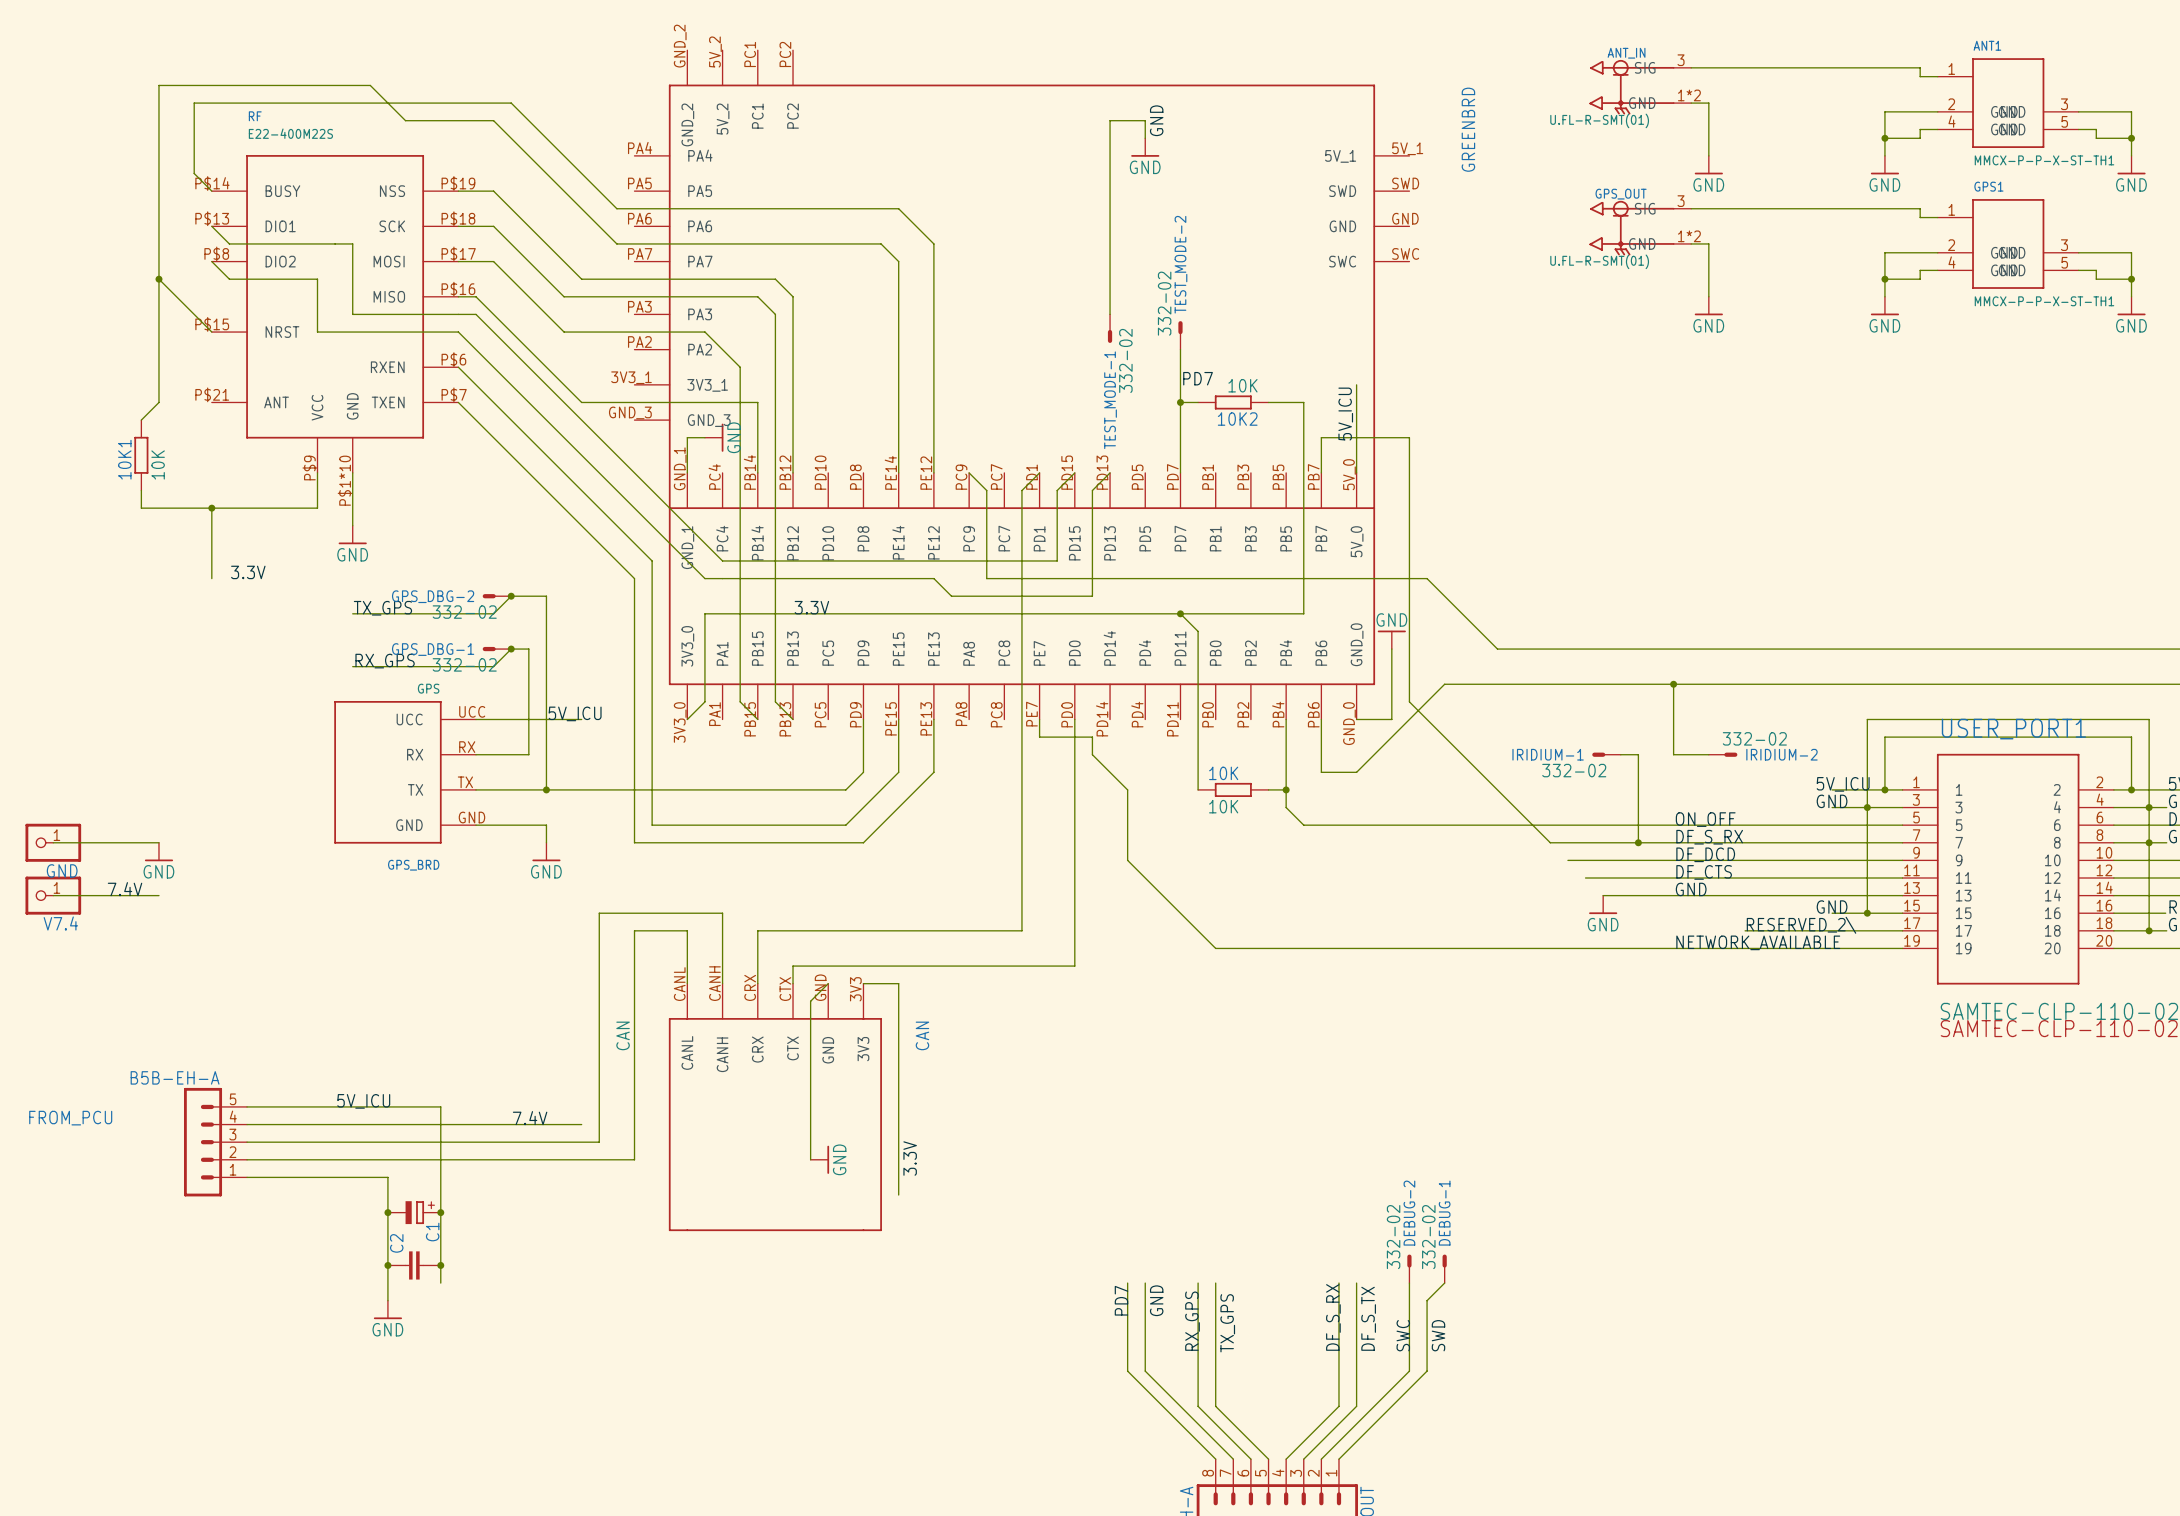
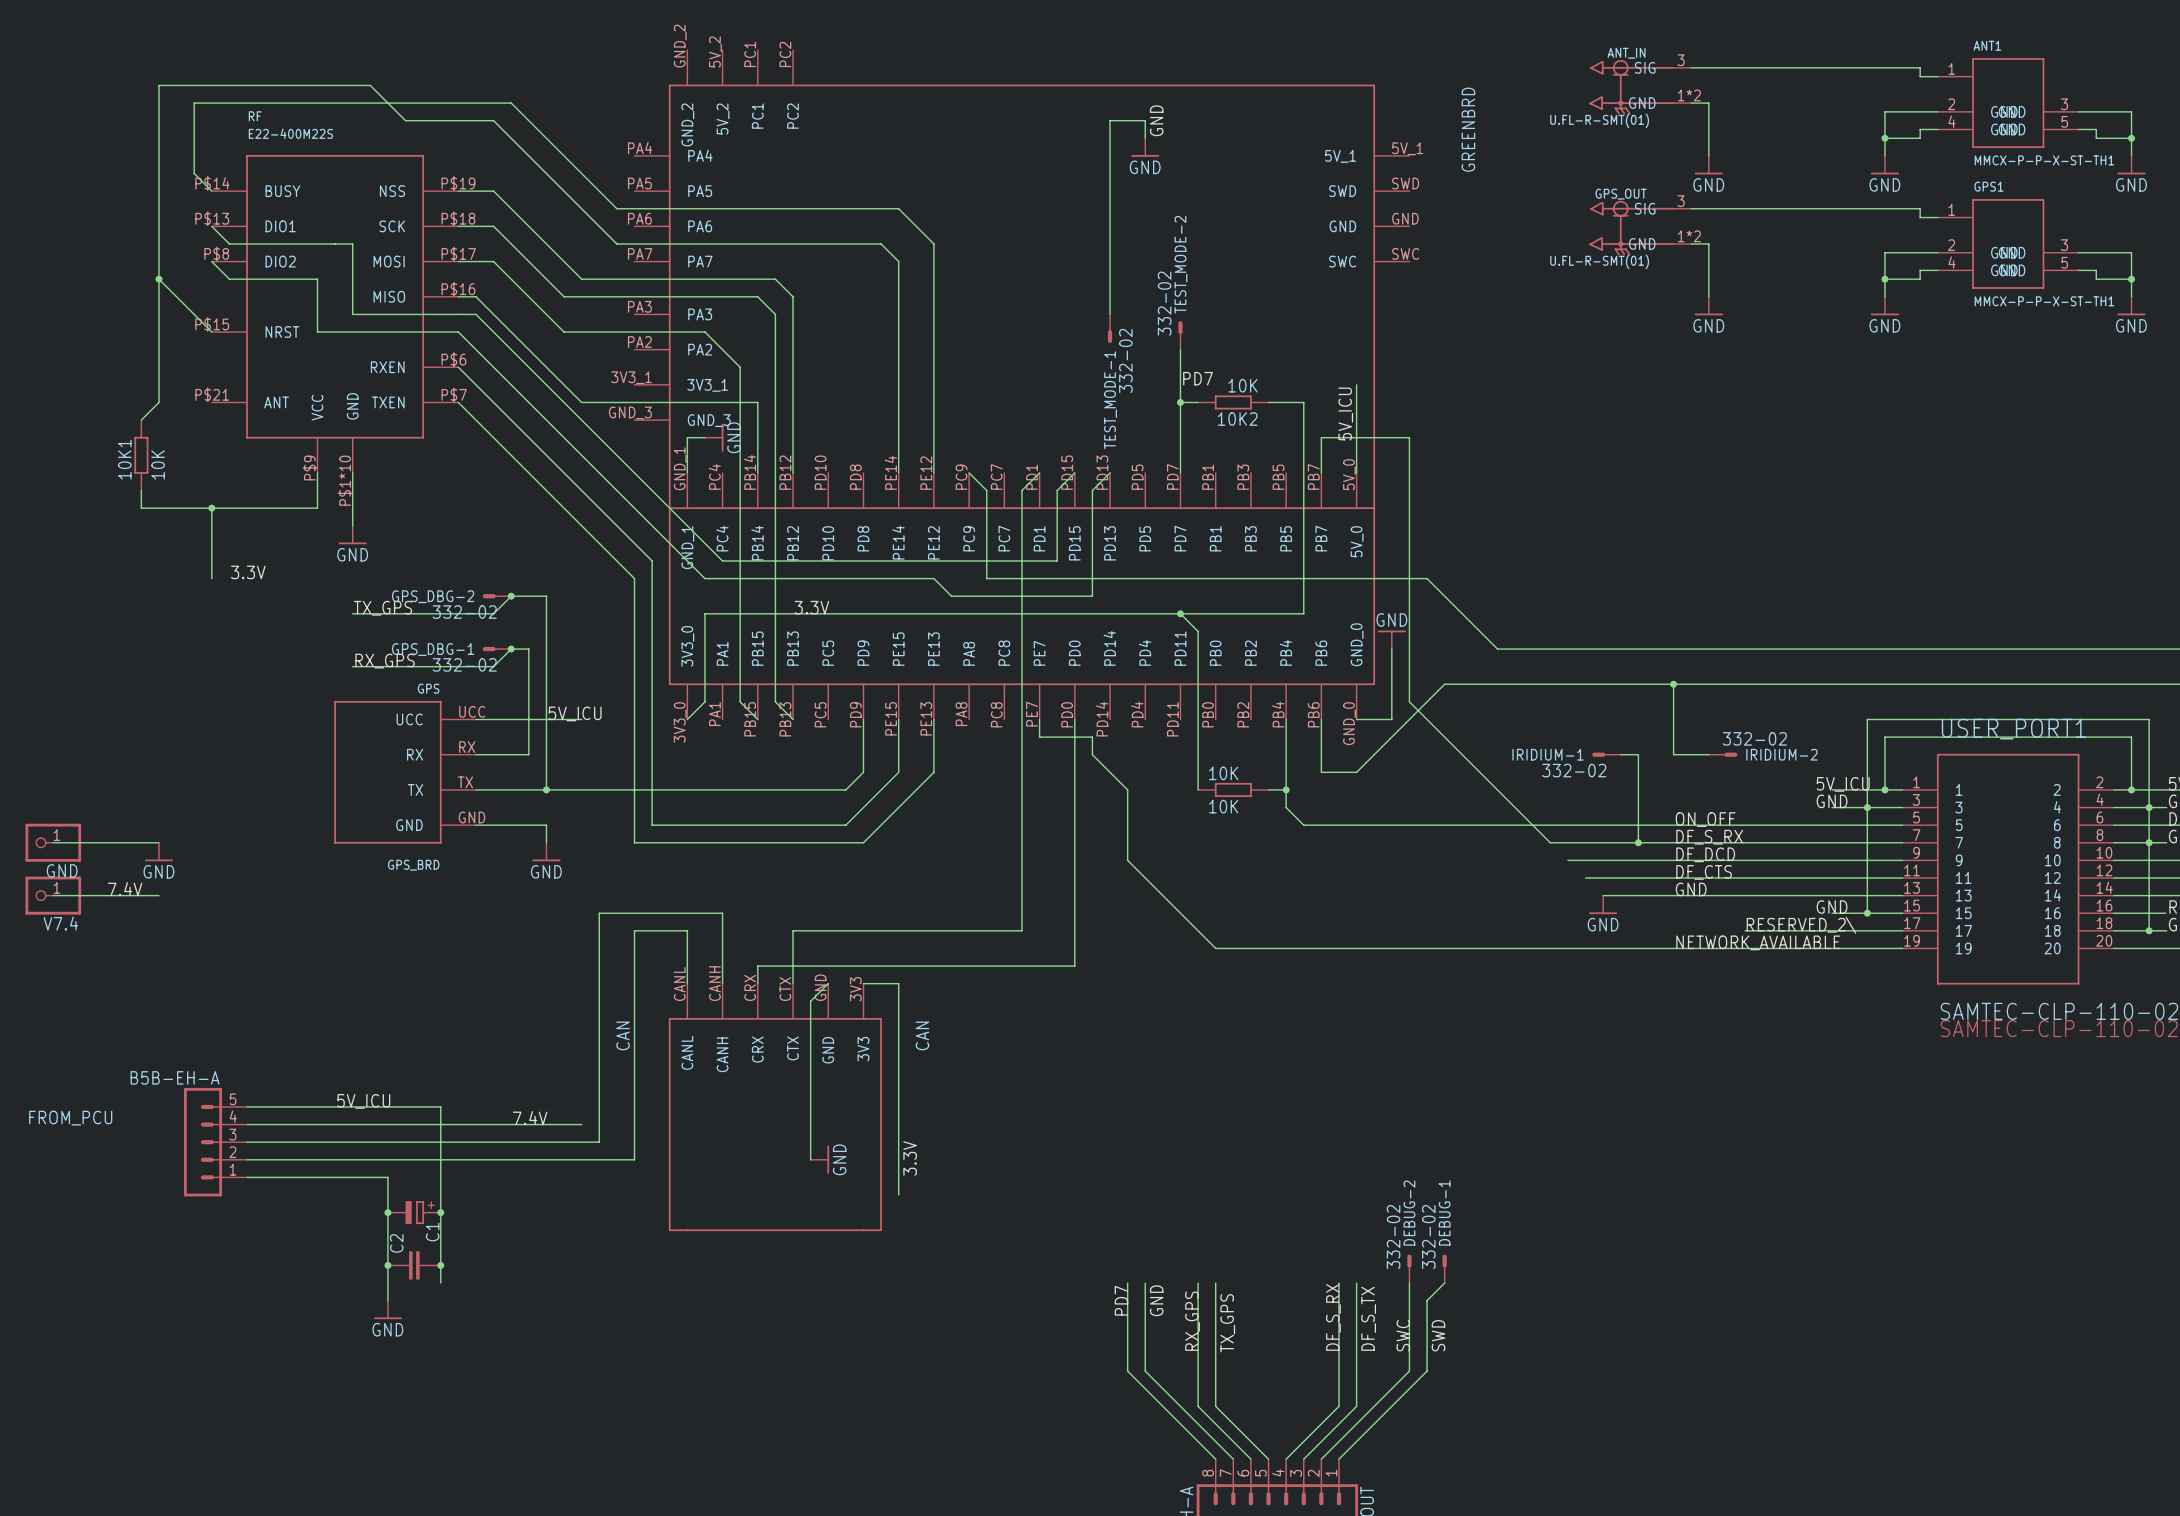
wire: (793, 930) (757, 930) (757, 966) -> (793, 930) (793, 966) (757, 966)

